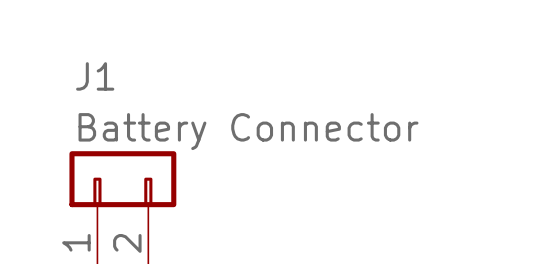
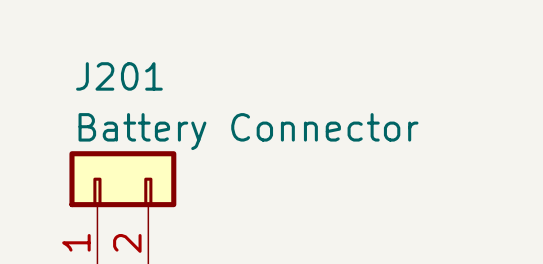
J1 name: J1 (95, 76) -> J201 (119, 76)

